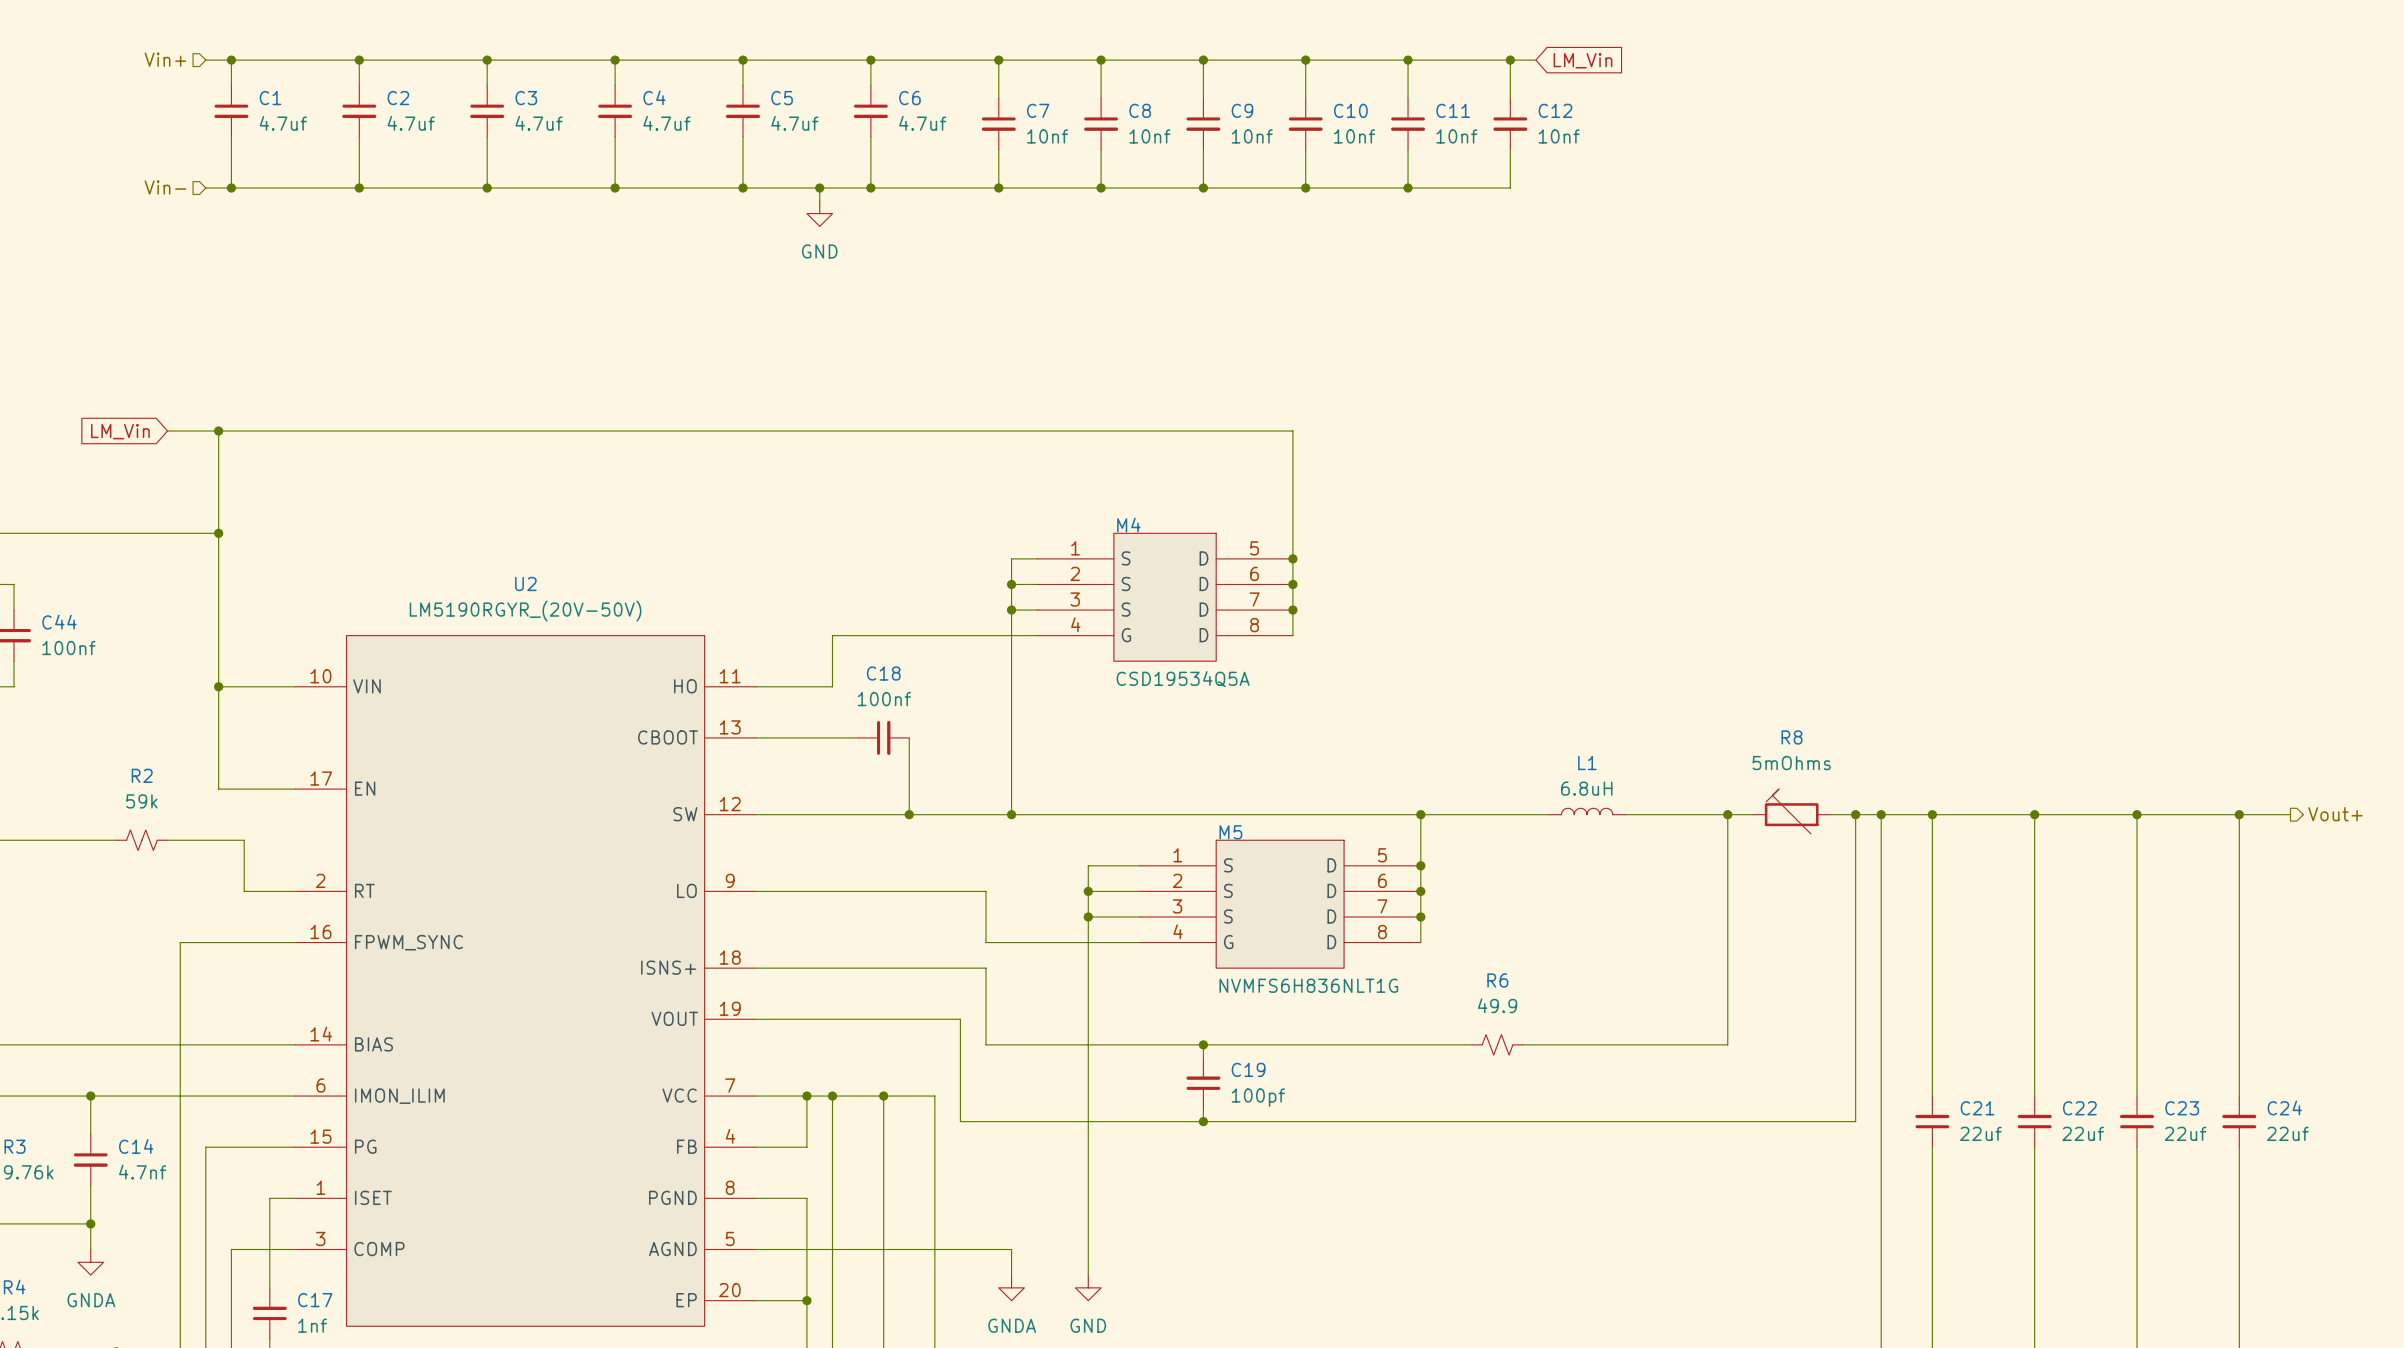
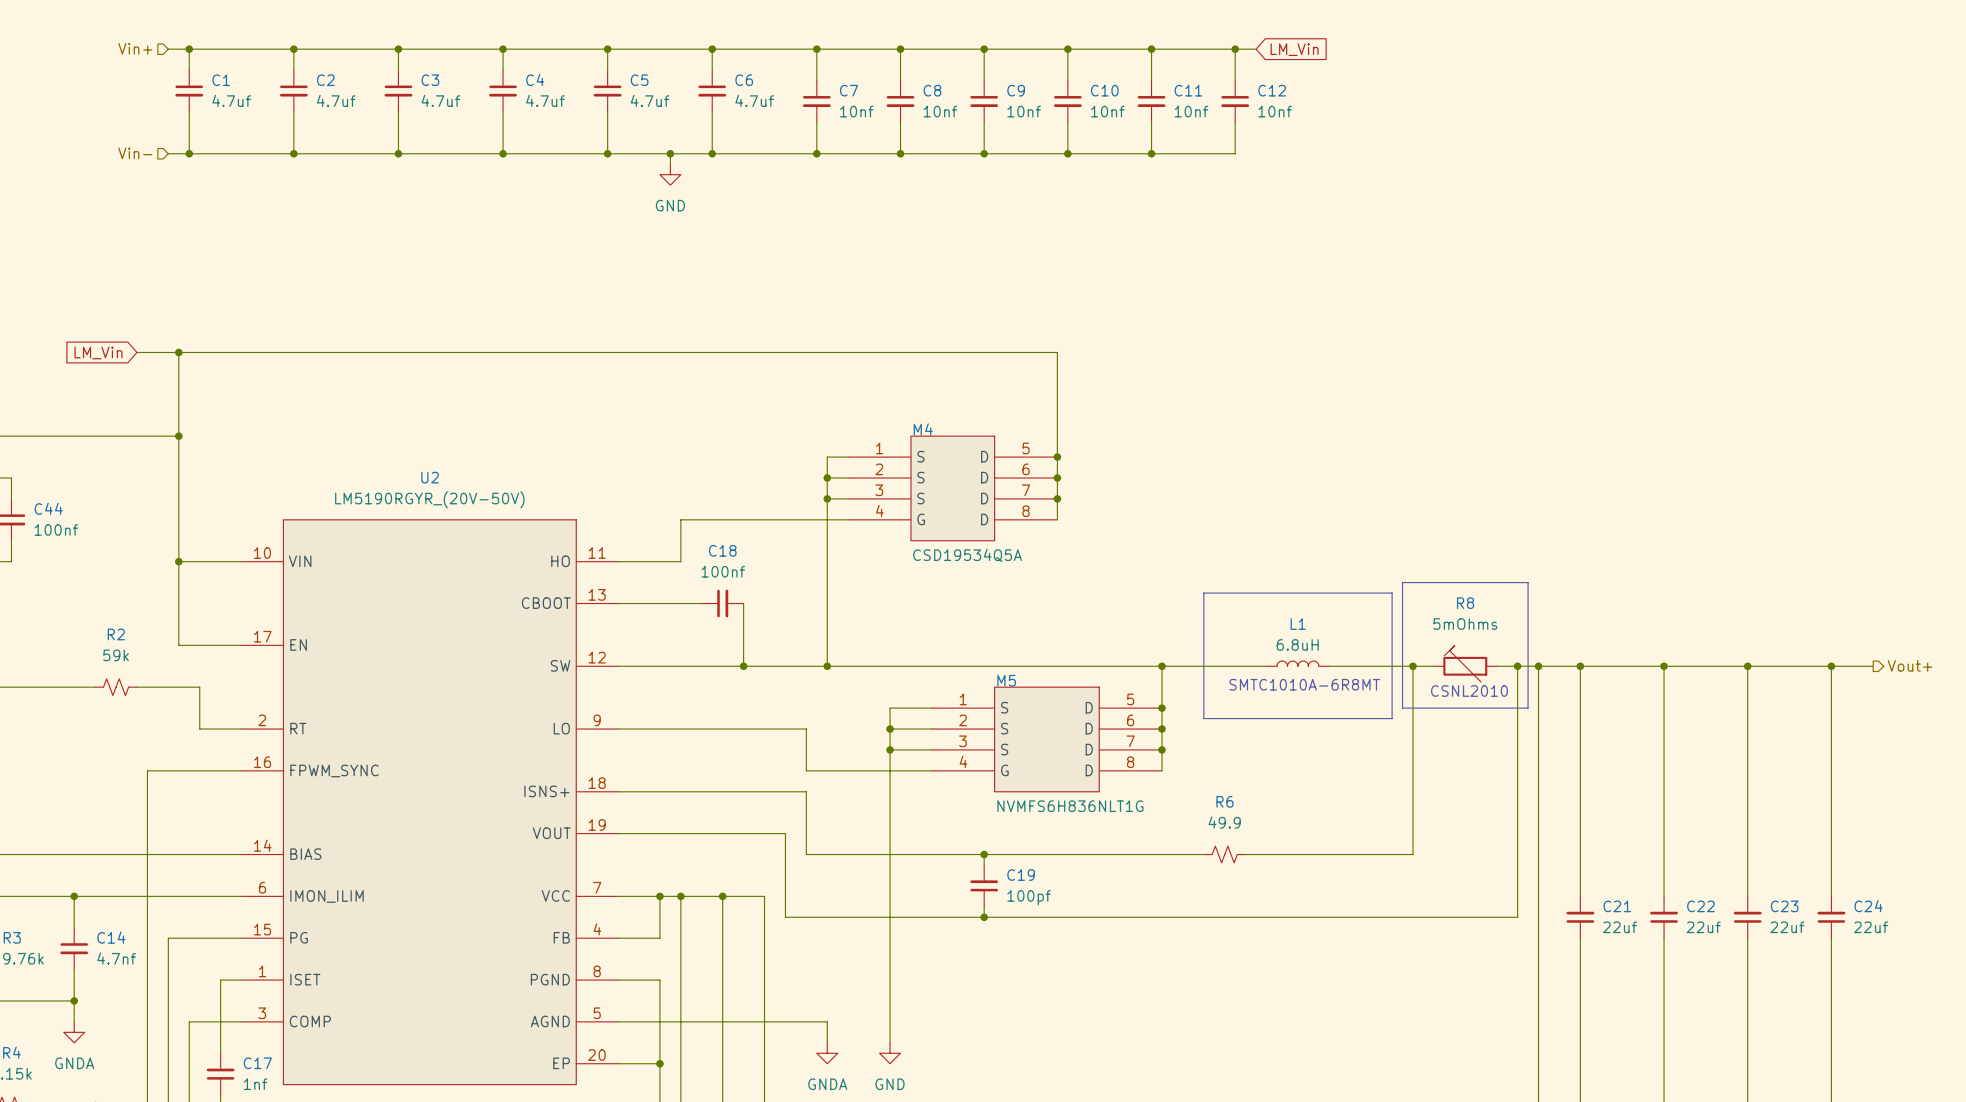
line: none -> (1402, 582) (1528, 582) (1528, 708) (1402, 708) (1402, 582)
line: none -> (1203, 593) (1392, 593) (1392, 718) (1203, 718) (1203, 593)
text: none -> SMTC1010A-6R8MT (1304, 684)
text: none -> CSNL2010 (1469, 691)

